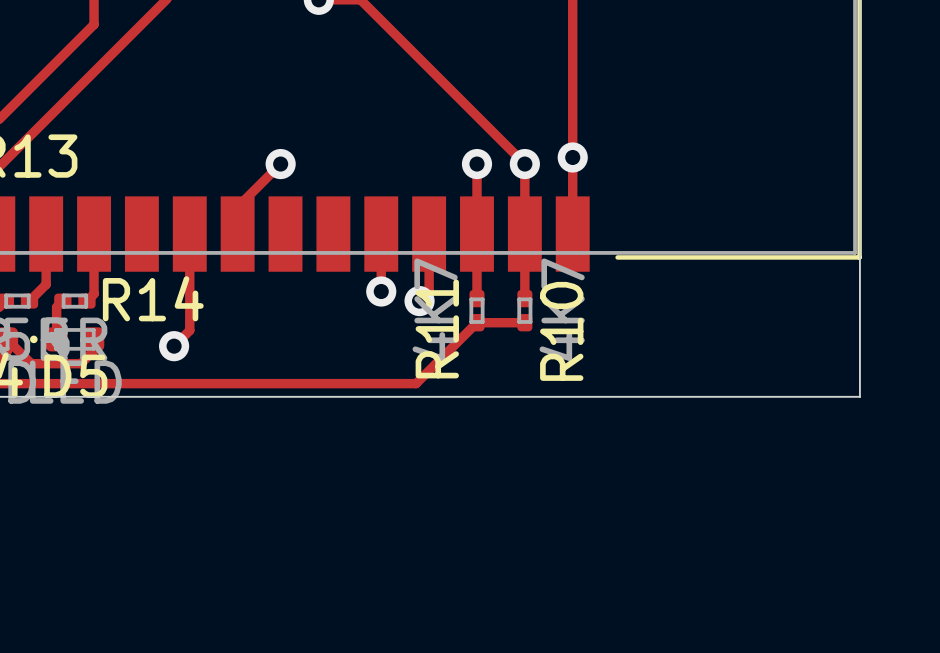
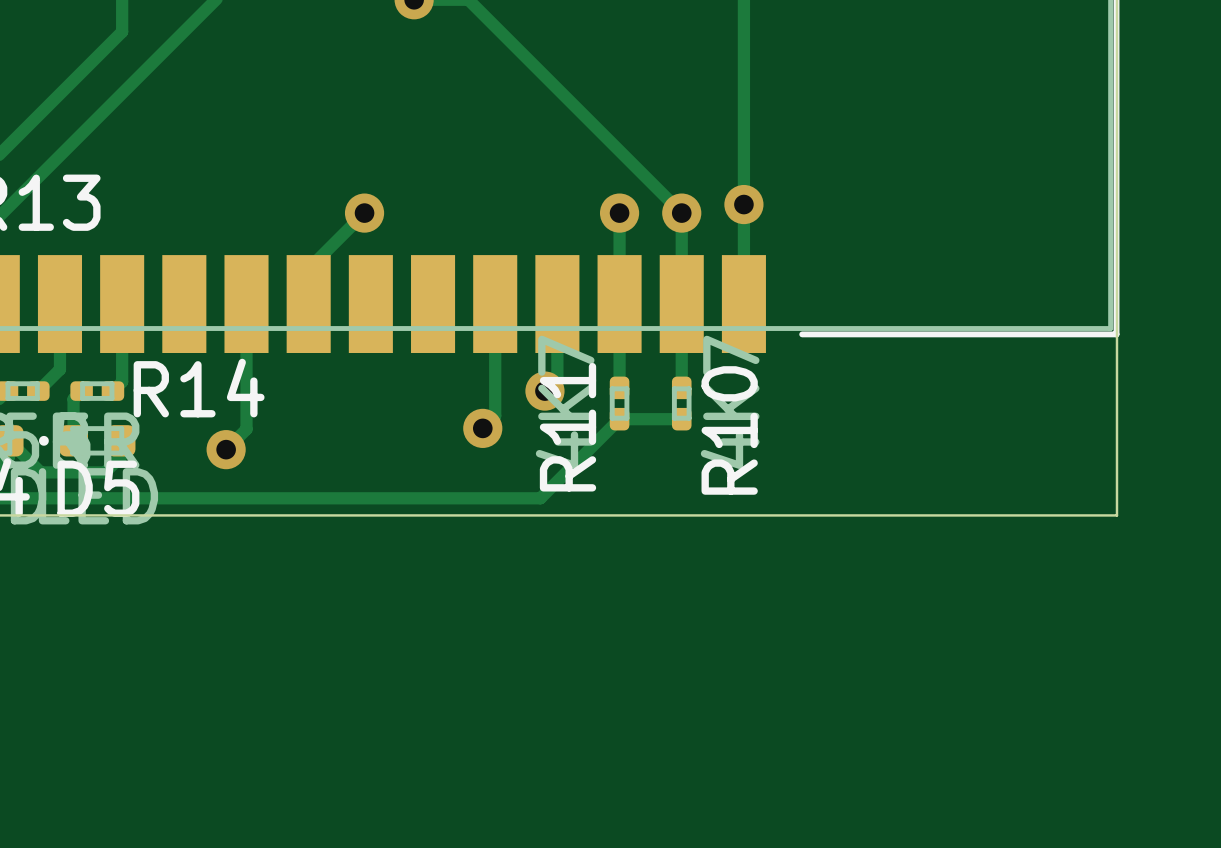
track: none -> (495, 378) (495, 415) (482, 428)
via position: (381, 291) -> (482, 428)

